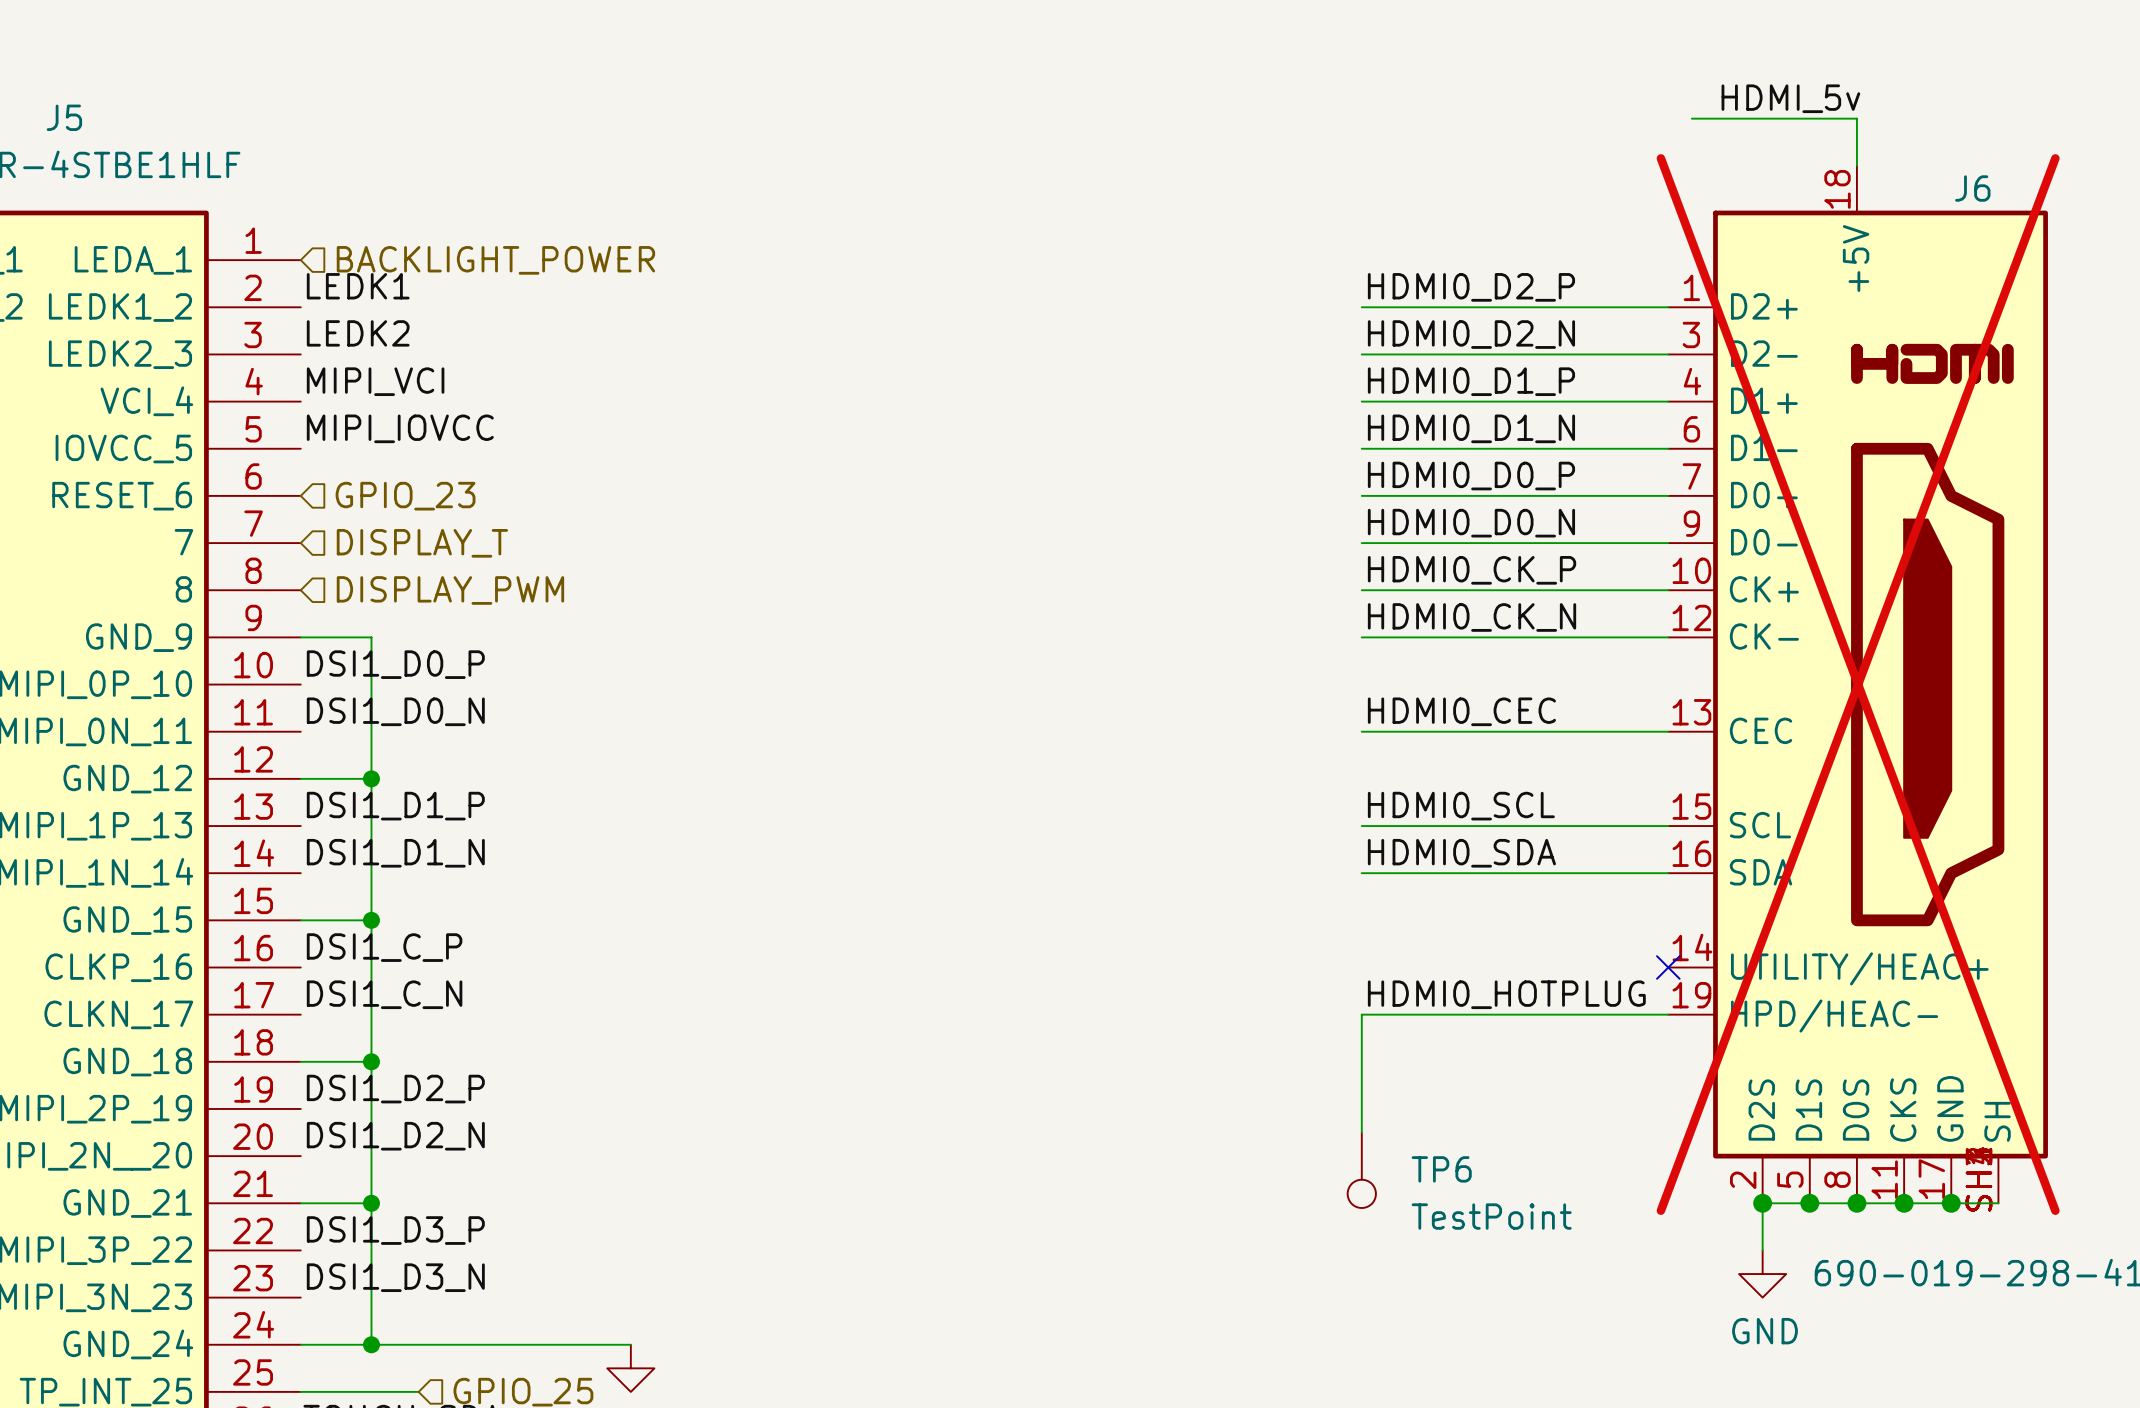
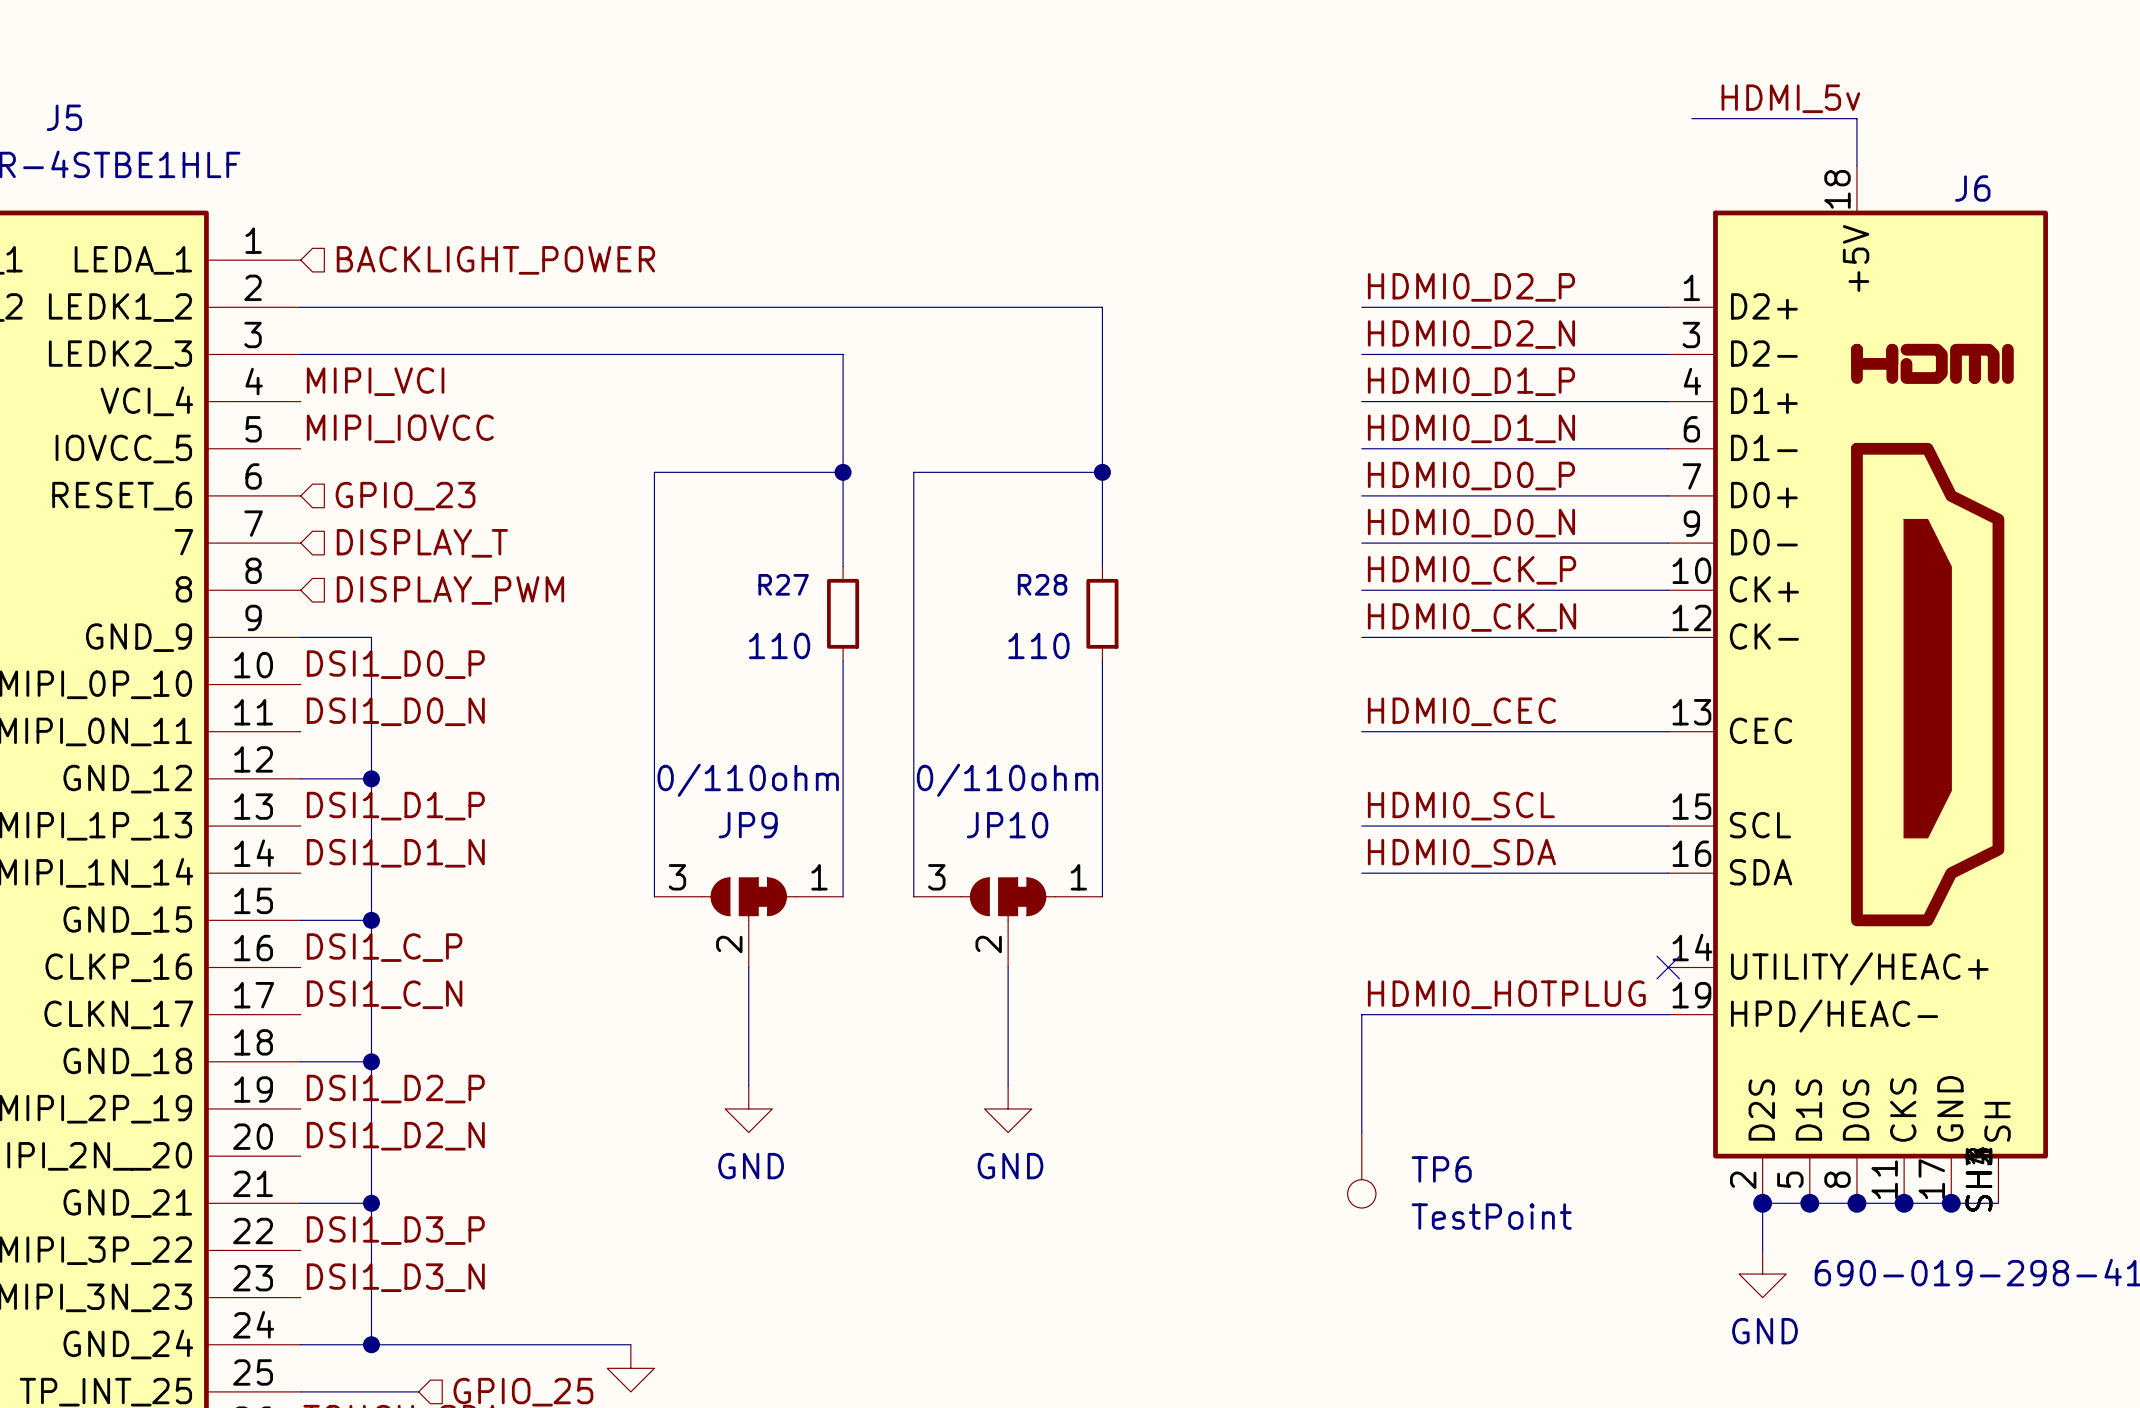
label: LEDK1 (358, 286) -> none
wire: none -> (300, 307) (1102, 307) (1102, 566)
label: LEDK2 (358, 333) -> none
wire: none -> (300, 354) (843, 354) (843, 566)
wire: none -> (843, 472) (654, 472) (654, 896)
junction: none -> (843, 472)
wire: none -> (1102, 472) (913, 472) (913, 896)
junction: none -> (1102, 472)
R27: none -> 110 (843, 613)
R28: none -> 110 (1102, 613)
wire: none -> (843, 660) (843, 896)
wire: none -> (1102, 660) (1102, 896)
J6 do-not-place cross: (1858, 684) -> none
JP9: none -> 0/110ohm (748, 922)
JP10: none -> 0/110ohm (1008, 922)
wire: none -> (748, 967) (748, 1085)
wire: none -> (1008, 967) (1008, 1085)
power symbol: none -> GND (748, 1108)
power symbol: none -> GND (1008, 1108)

